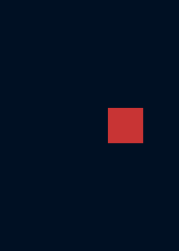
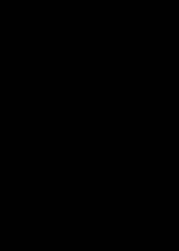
part: (125, 125) -> none

